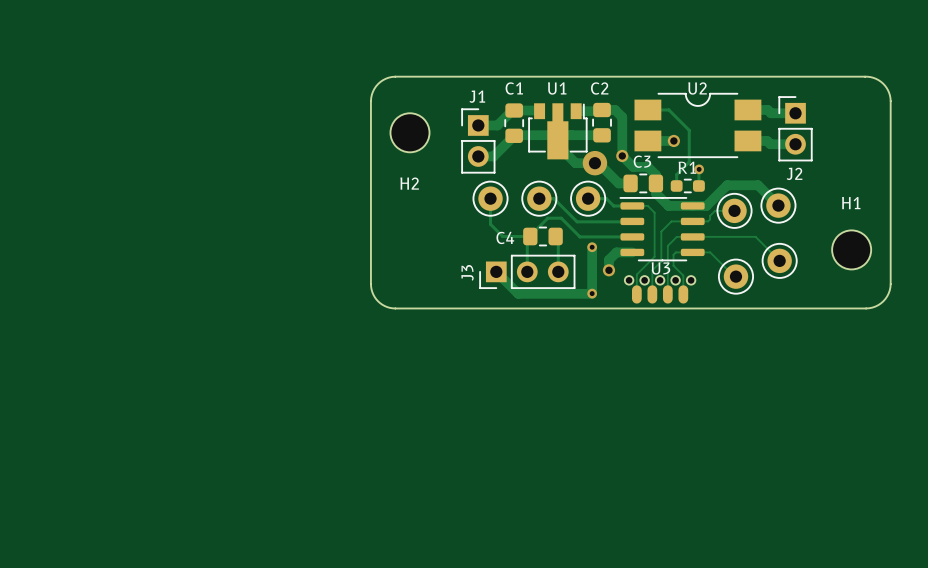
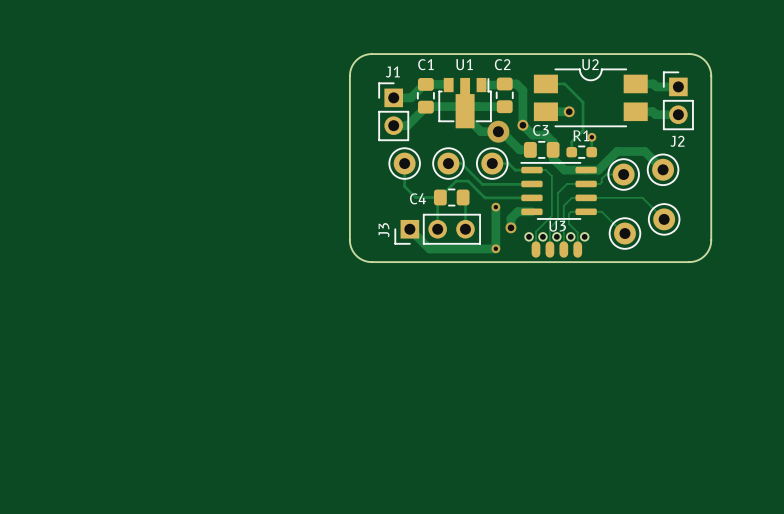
board edge: (453, 76) (389, 77) (376, 86) (370, 101) (372, 292) (378, 301) (389, 307) (453, 308) -> (371, 54) (364, 55) (356, 60) (352, 66) (349, 75) (350, 242) (356, 255) (364, 260) (371, 262)
board edge: (807, 76) (873, 77) (886, 87) (890, 101) (890, 284) (888, 293) (880, 303) (869, 308) (807, 308) -> (689, 54) (698, 56) (704, 60) (710, 68) (711, 75) (711, 242) (704, 255) (698, 259) (689, 262)
H2: (410, 132) -> none
H1: (851, 249) -> none

